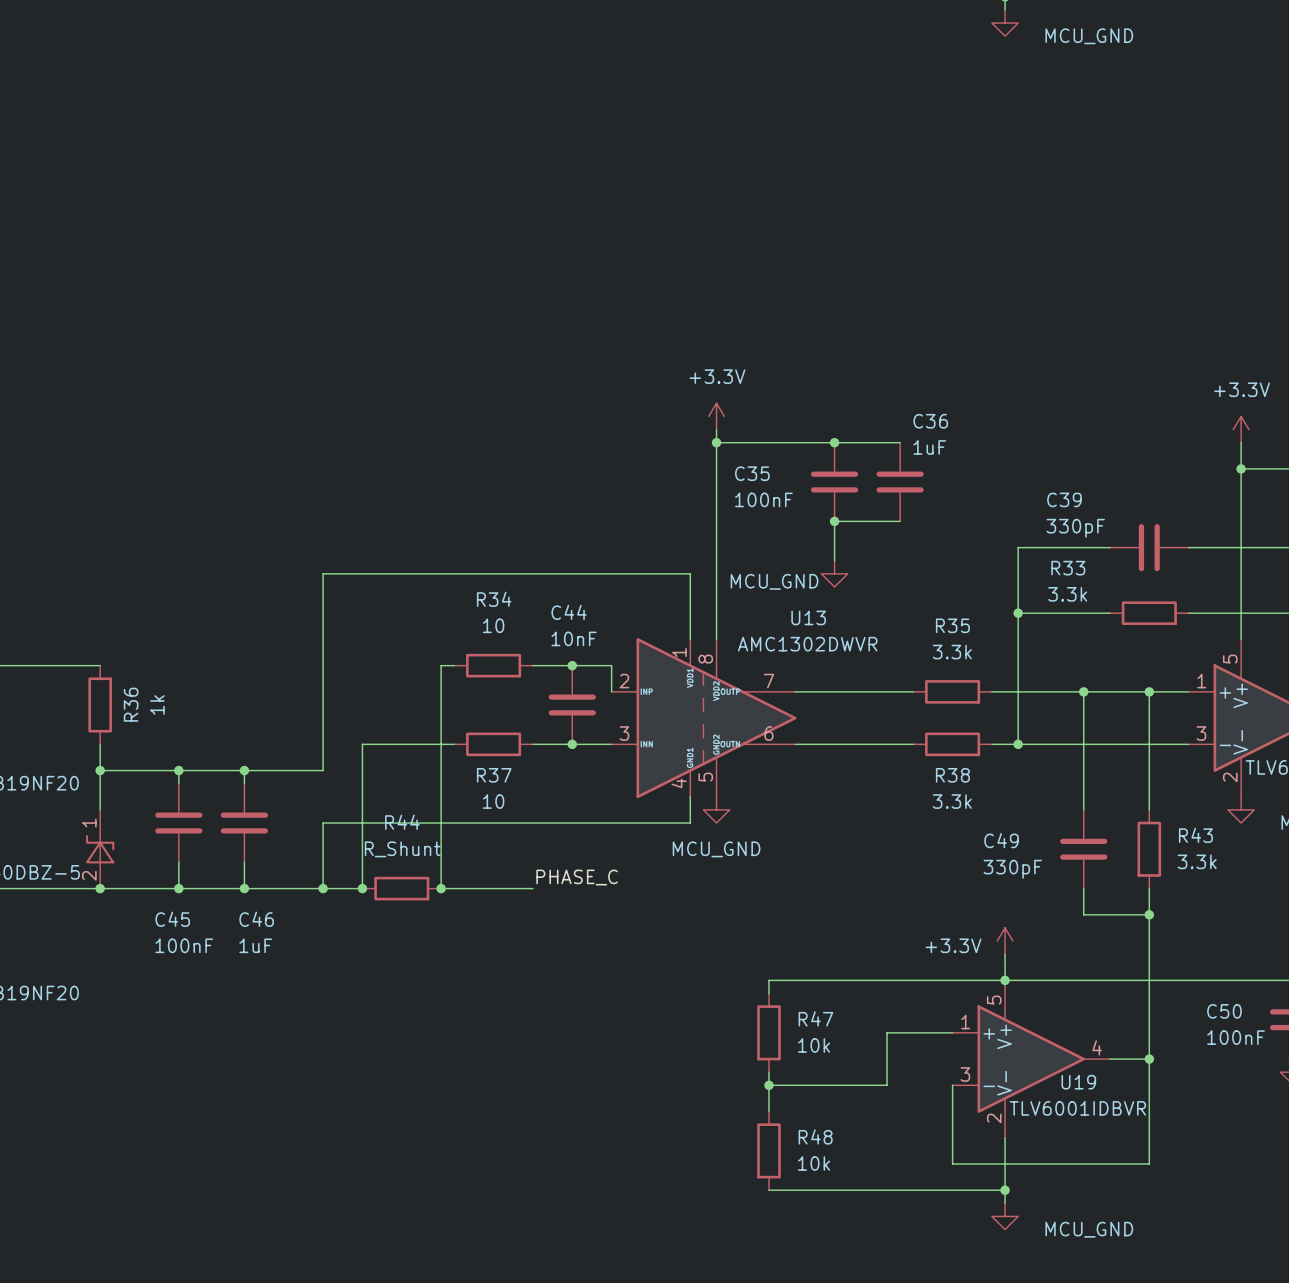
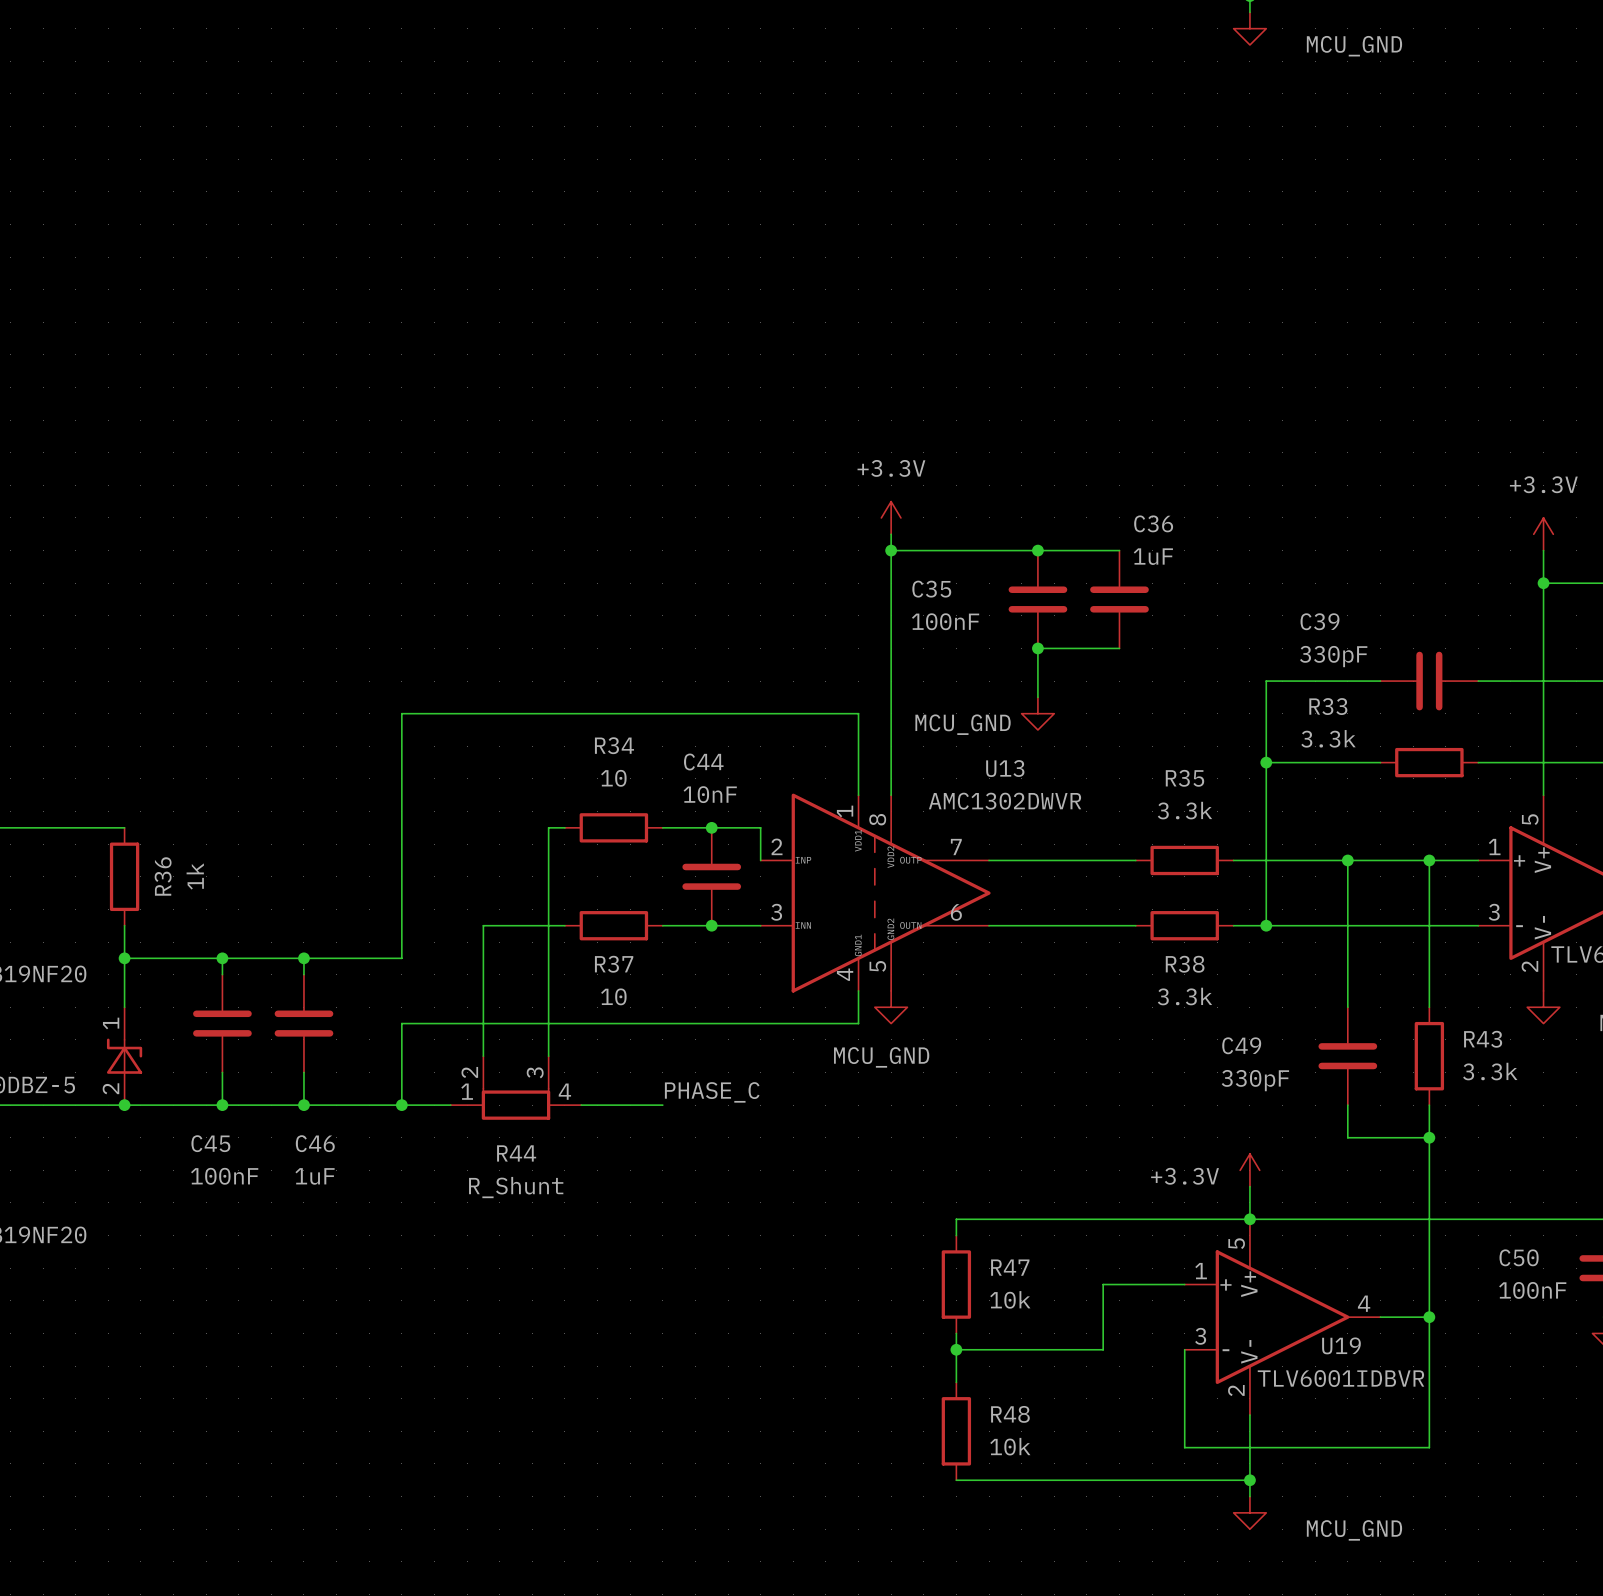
wire: (388, 744) (362, 744) (362, 888) -> (483, 925) (483, 1056)
R44 name position: R44 (402, 822) -> R44 (516, 1153)
R44 value position: R_Shunt (402, 849) -> R_Shunt (516, 1187)
R44 symbol: [362, 876, 442, 901] -> [450, 1056, 582, 1120]
junction: (362, 888) -> none
junction: (441, 888) -> none

